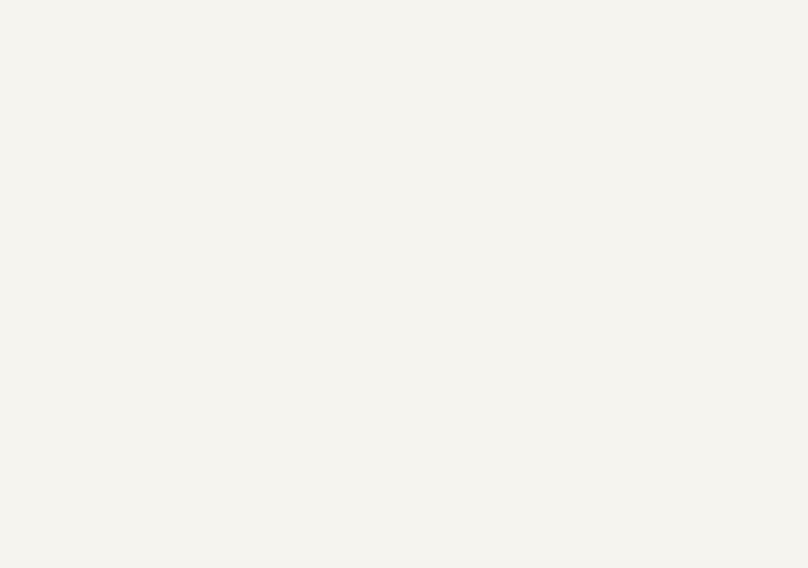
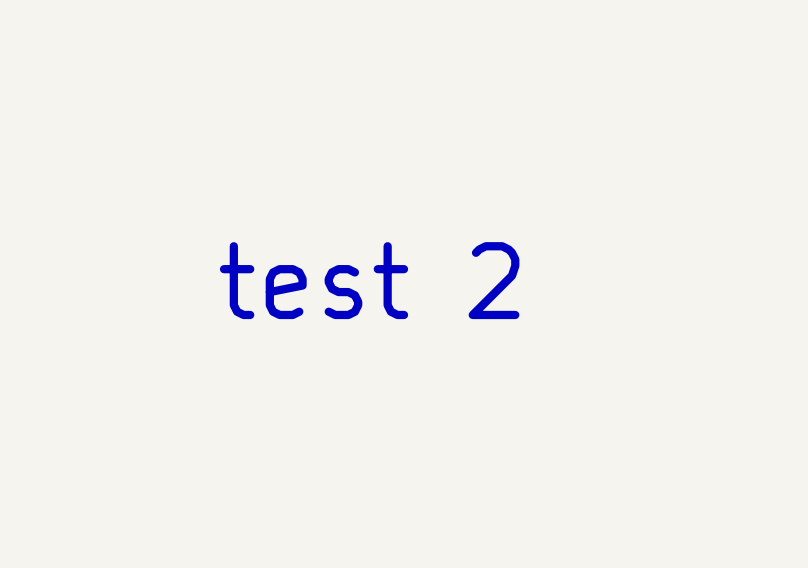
text: none -> test 2 (369, 280)

